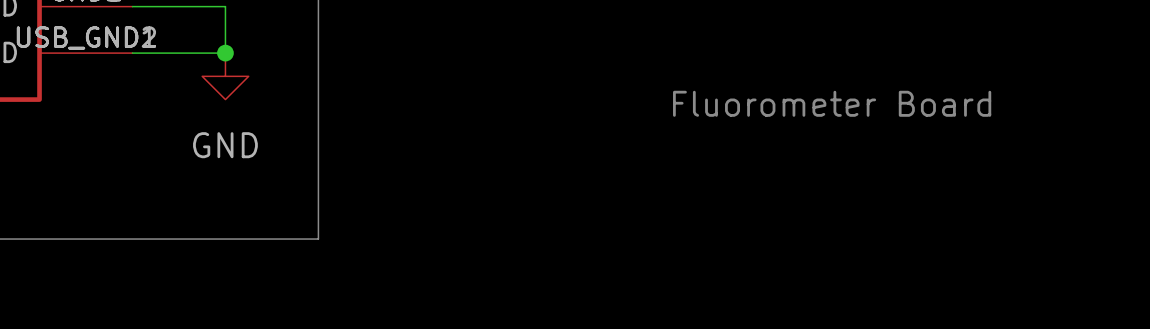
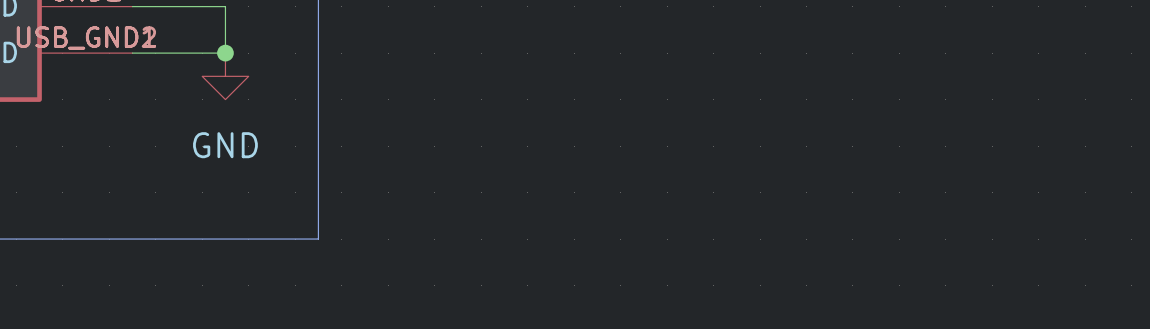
text: Fluorometer Board (832, 103) -> none

